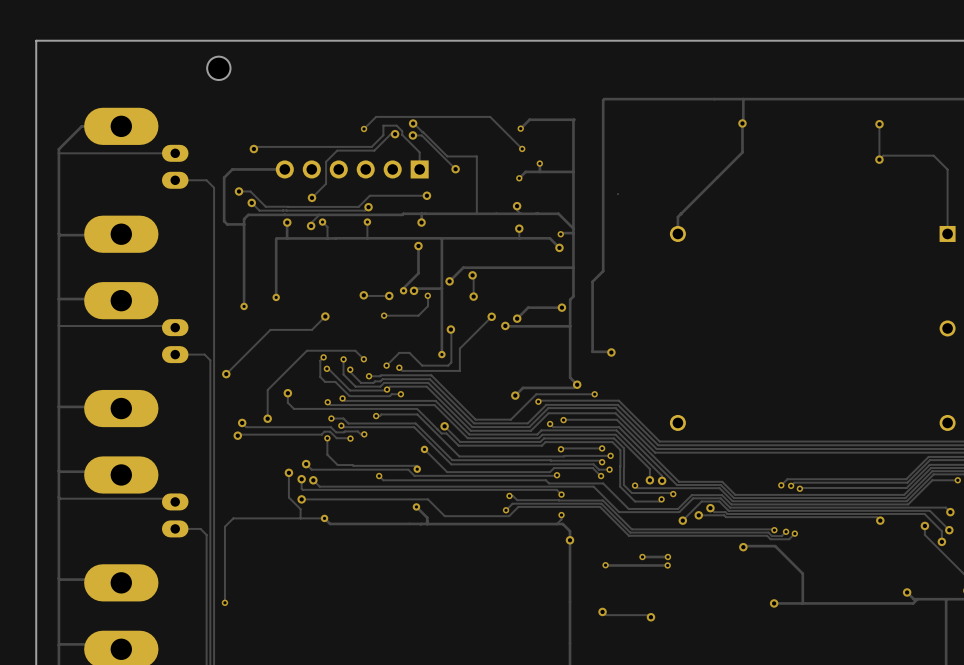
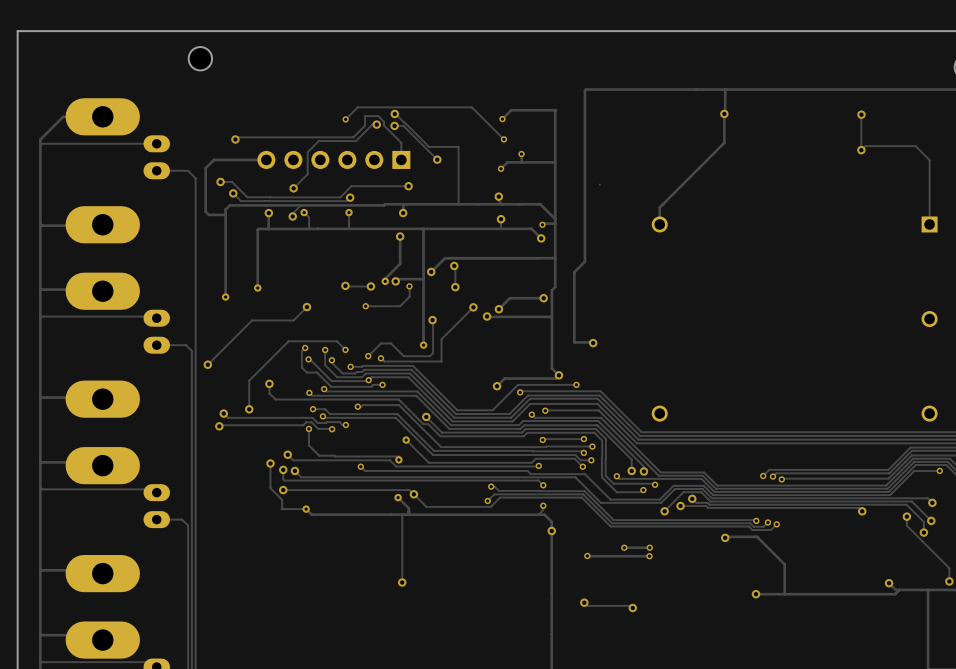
via: none -> (413, 494)
track: (299, 518) (233, 518) (224, 526) (224, 602) -> none
track: none -> (402, 515) (402, 582)
via: none -> (402, 582)
via: (224, 602) -> none

